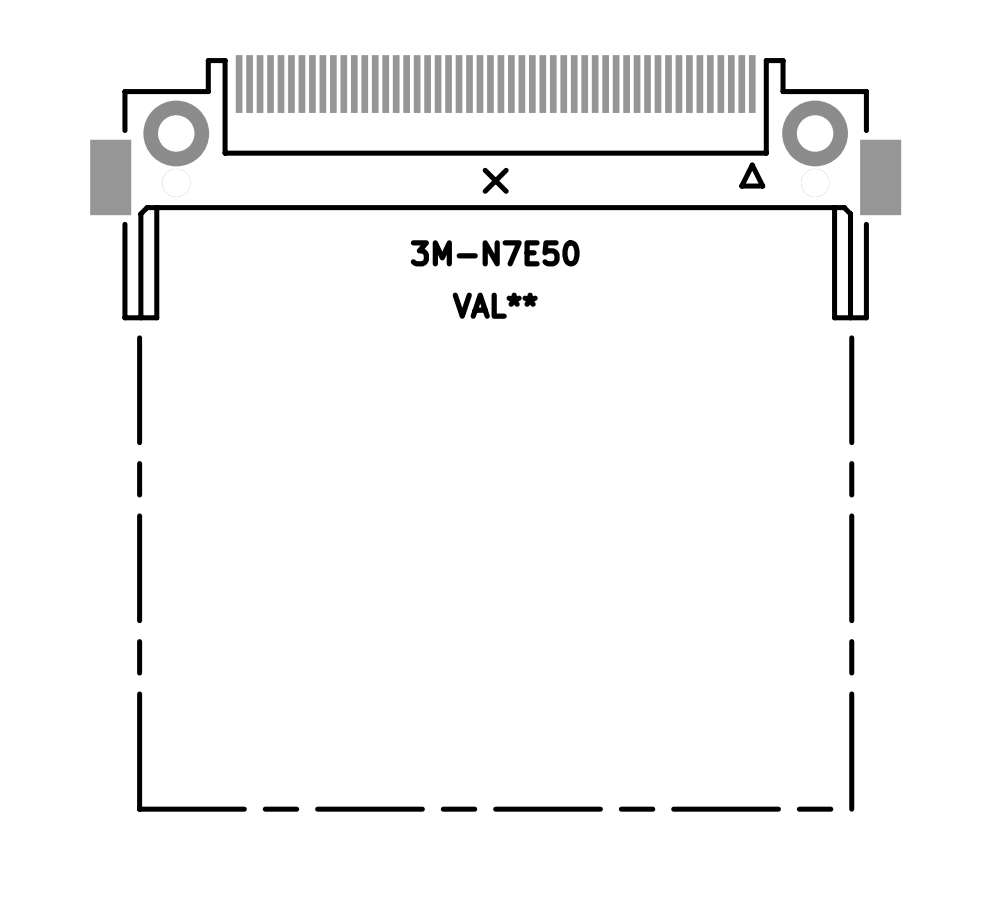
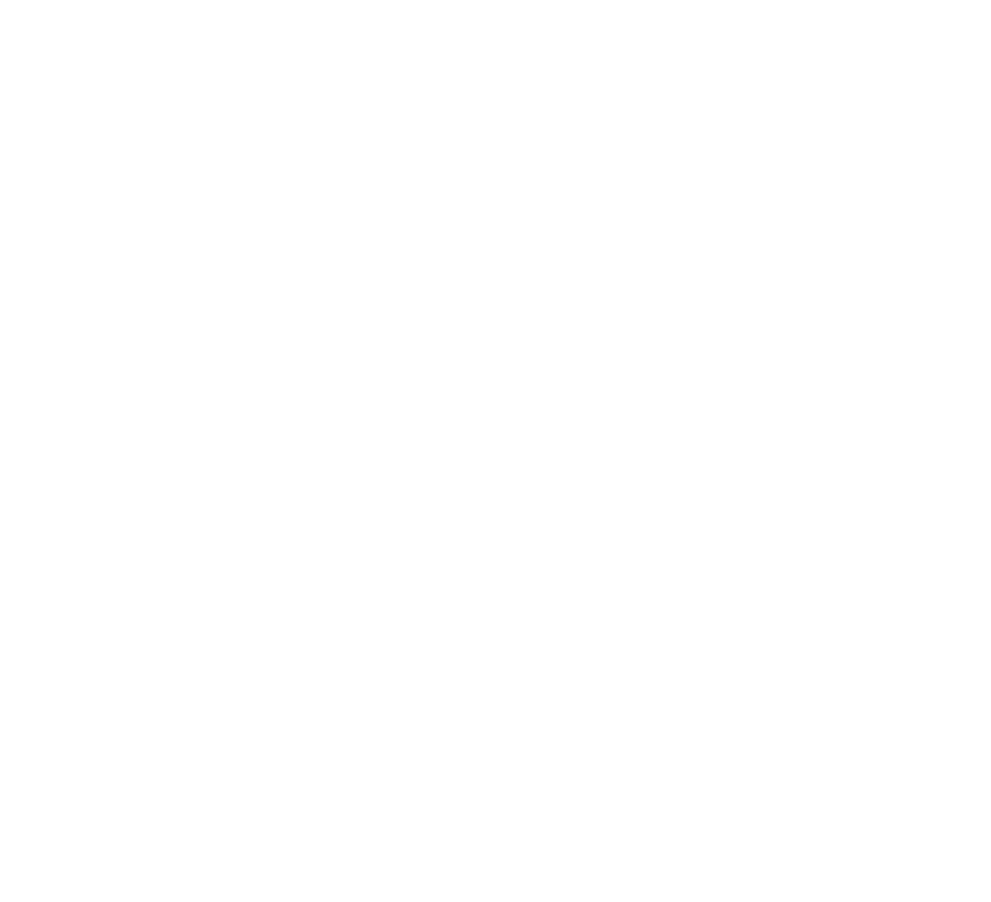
3M-N7E50: VAL** (495, 433) -> none

